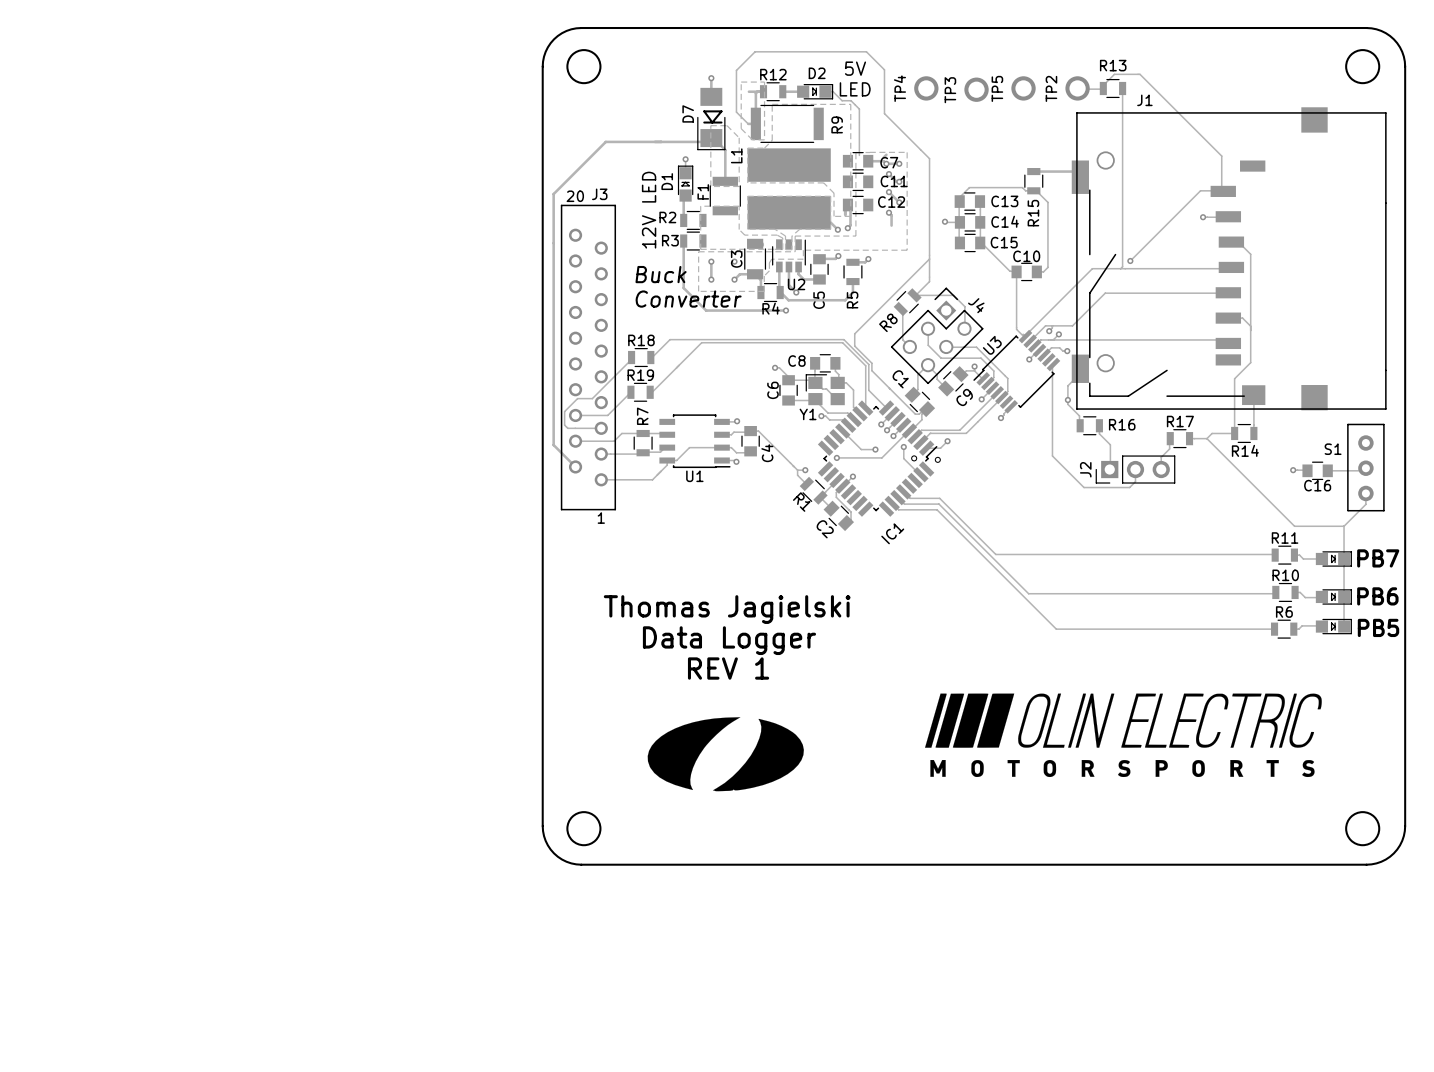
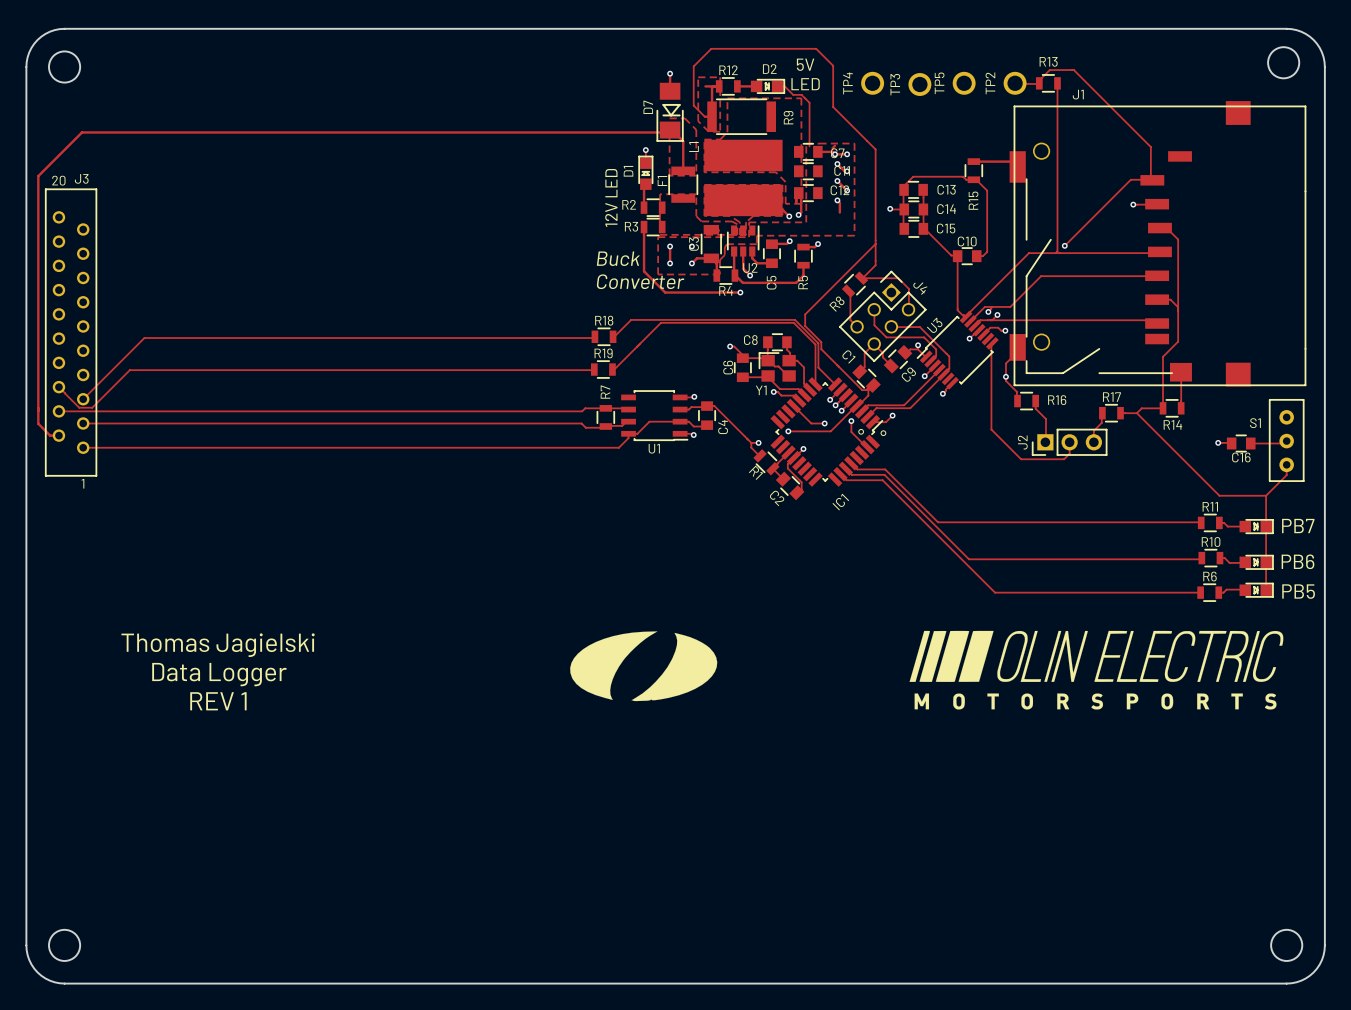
board edge: (581, 28) (1366, 28) (1381, 30) (1393, 39) (1402, 51) (1405, 66) (1405, 826) (1402, 840) (1393, 853) (1381, 861) (1366, 864) (581, 864) (566, 861) (554, 853) (545, 840) (542, 826) (542, 66) (545, 51) (554, 39) (566, 30) (581, 28) -> (64, 28) (49, 31) (37, 39) (29, 52) (26, 67) (26, 945) (29, 960) (41, 975) (49, 980) (64, 983) (1286, 983) (1305, 978) (1316, 968) (1321, 960) (1324, 945) (1324, 67) (1319, 47) (1309, 36) (1301, 31) (1286, 28) (64, 28)
round board edge: [566, 49, 602, 85] -> none
round board edge: none -> [48, 50, 82, 84]
track: none -> (671, 132) (81, 132) (38, 176) (38, 423) (50, 435) (58, 435)
track: (705, 141) (605, 141) (553, 194) (553, 445) (575, 466) -> none
J3 position: (588, 357) -> (71, 332)
track: none -> (594, 338) (144, 338) (83, 399)
track: (632, 358) (592, 398) (577, 398) (564, 411) (564, 425) (567, 428) (601, 428) -> none
track: (632, 391) (607, 415) (575, 415) -> none
track: none -> (595, 370) (129, 370) (92, 407) (79, 407) (58, 387)
track: (621, 433) (614, 441) (575, 441) -> (585, 408) (582, 411) (58, 411)
track: (601, 454) (621, 454) -> (83, 423) (581, 423) (585, 427)
track: (657, 475) (652, 479) (601, 479) -> (618, 447) (83, 447)
text: Thomas Jagielski (727, 609) -> none
text: Data Logger (729, 640) -> none
text: REV 1 (728, 668) -> none
text: none -> Thomas Jagielski (218, 645)
text: none -> Data Logger (219, 674)
drawing position: (1123, 735) -> (1096, 670)
text: none -> REV 1 (218, 701)
drawing position: (725, 754) -> (643, 666)
round board edge: [566, 811, 602, 847] -> none
round board edge position: (1362, 828) -> (1286, 945)
round board edge: none -> [48, 928, 82, 962]

